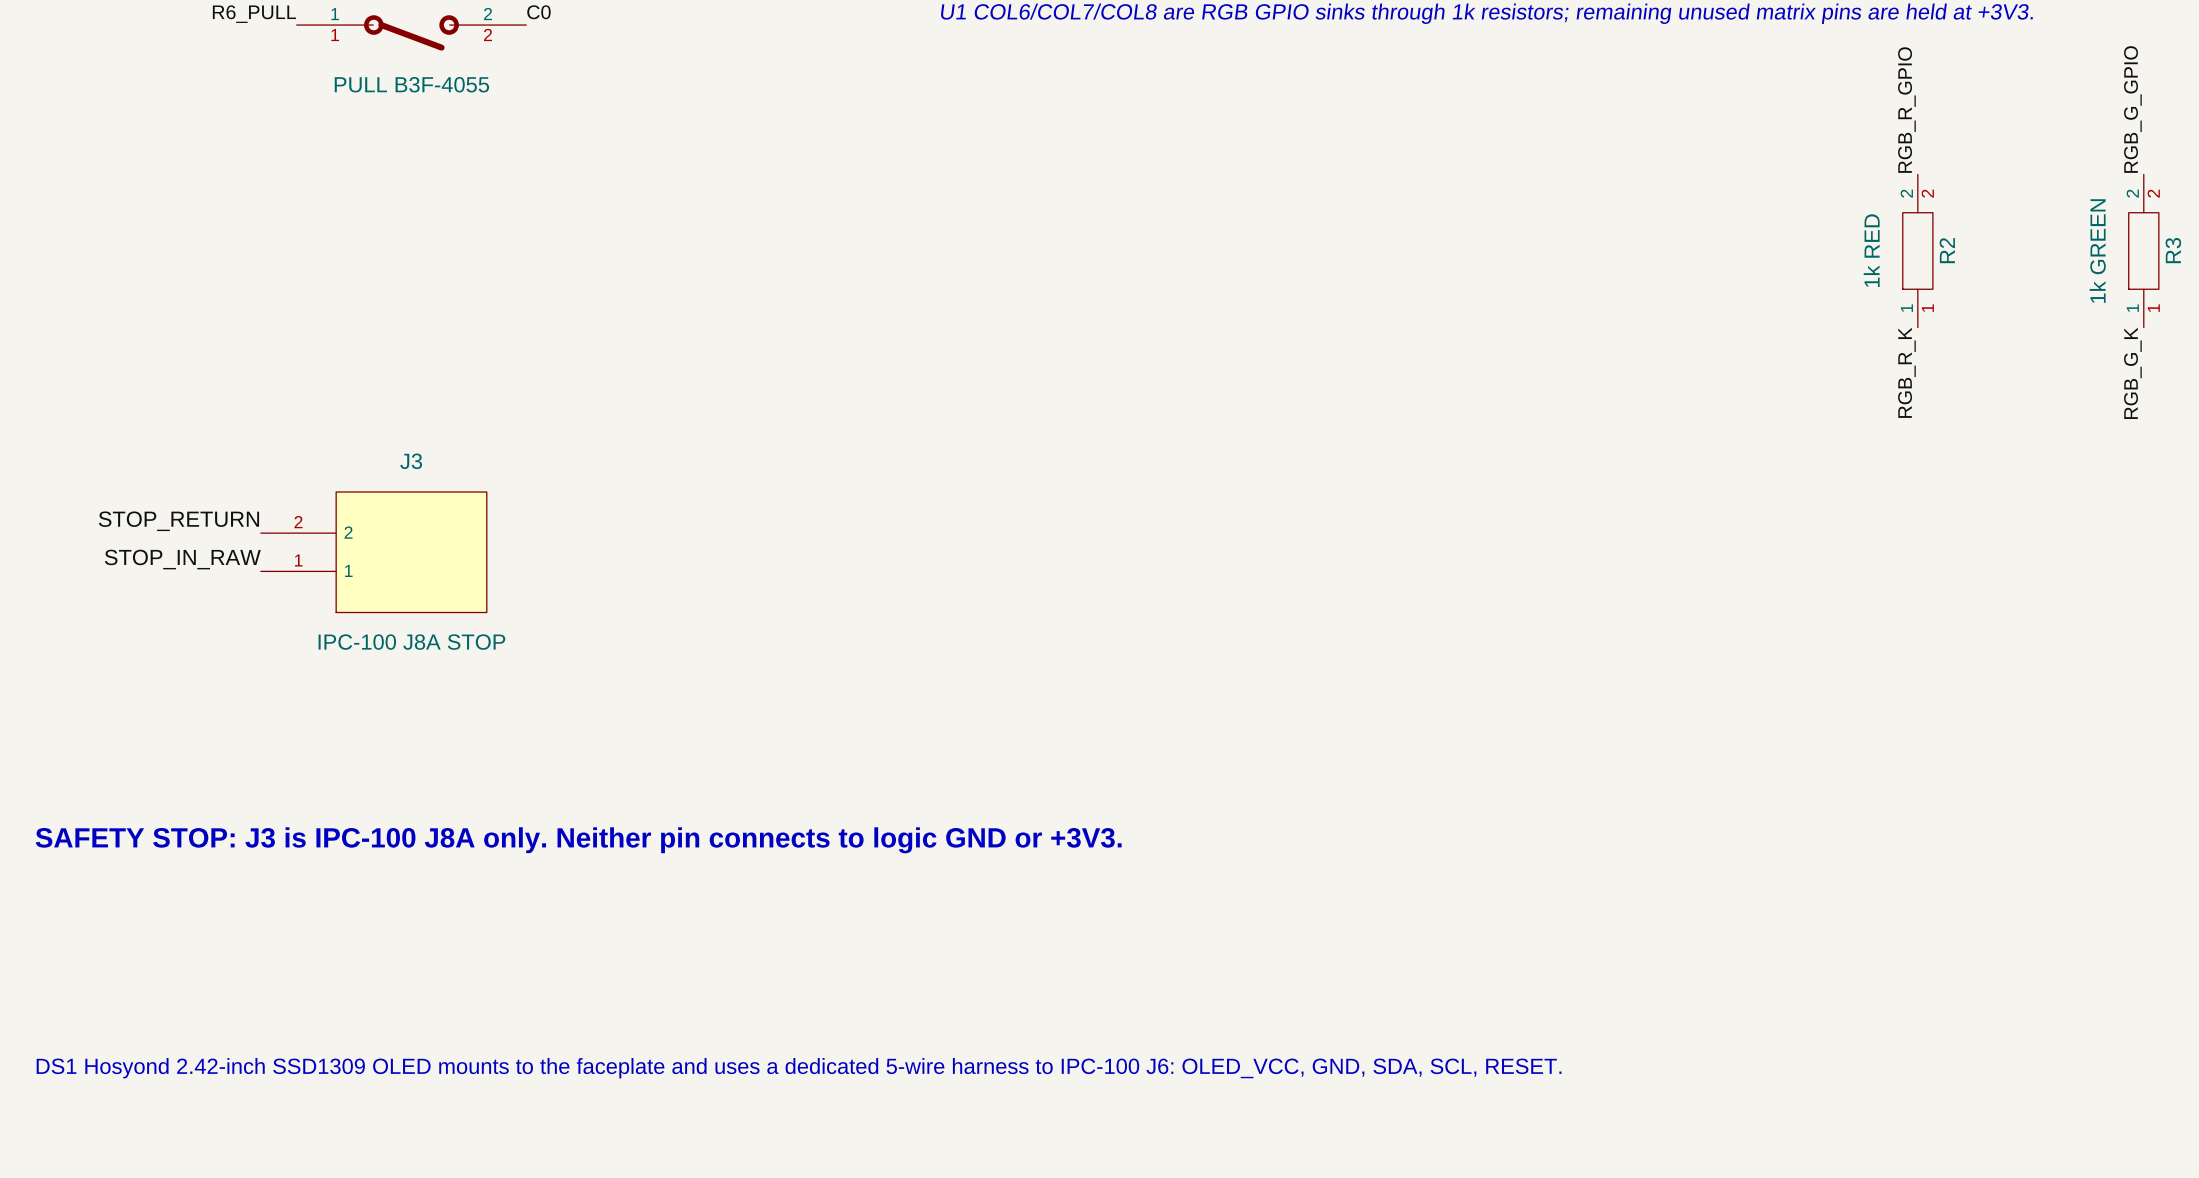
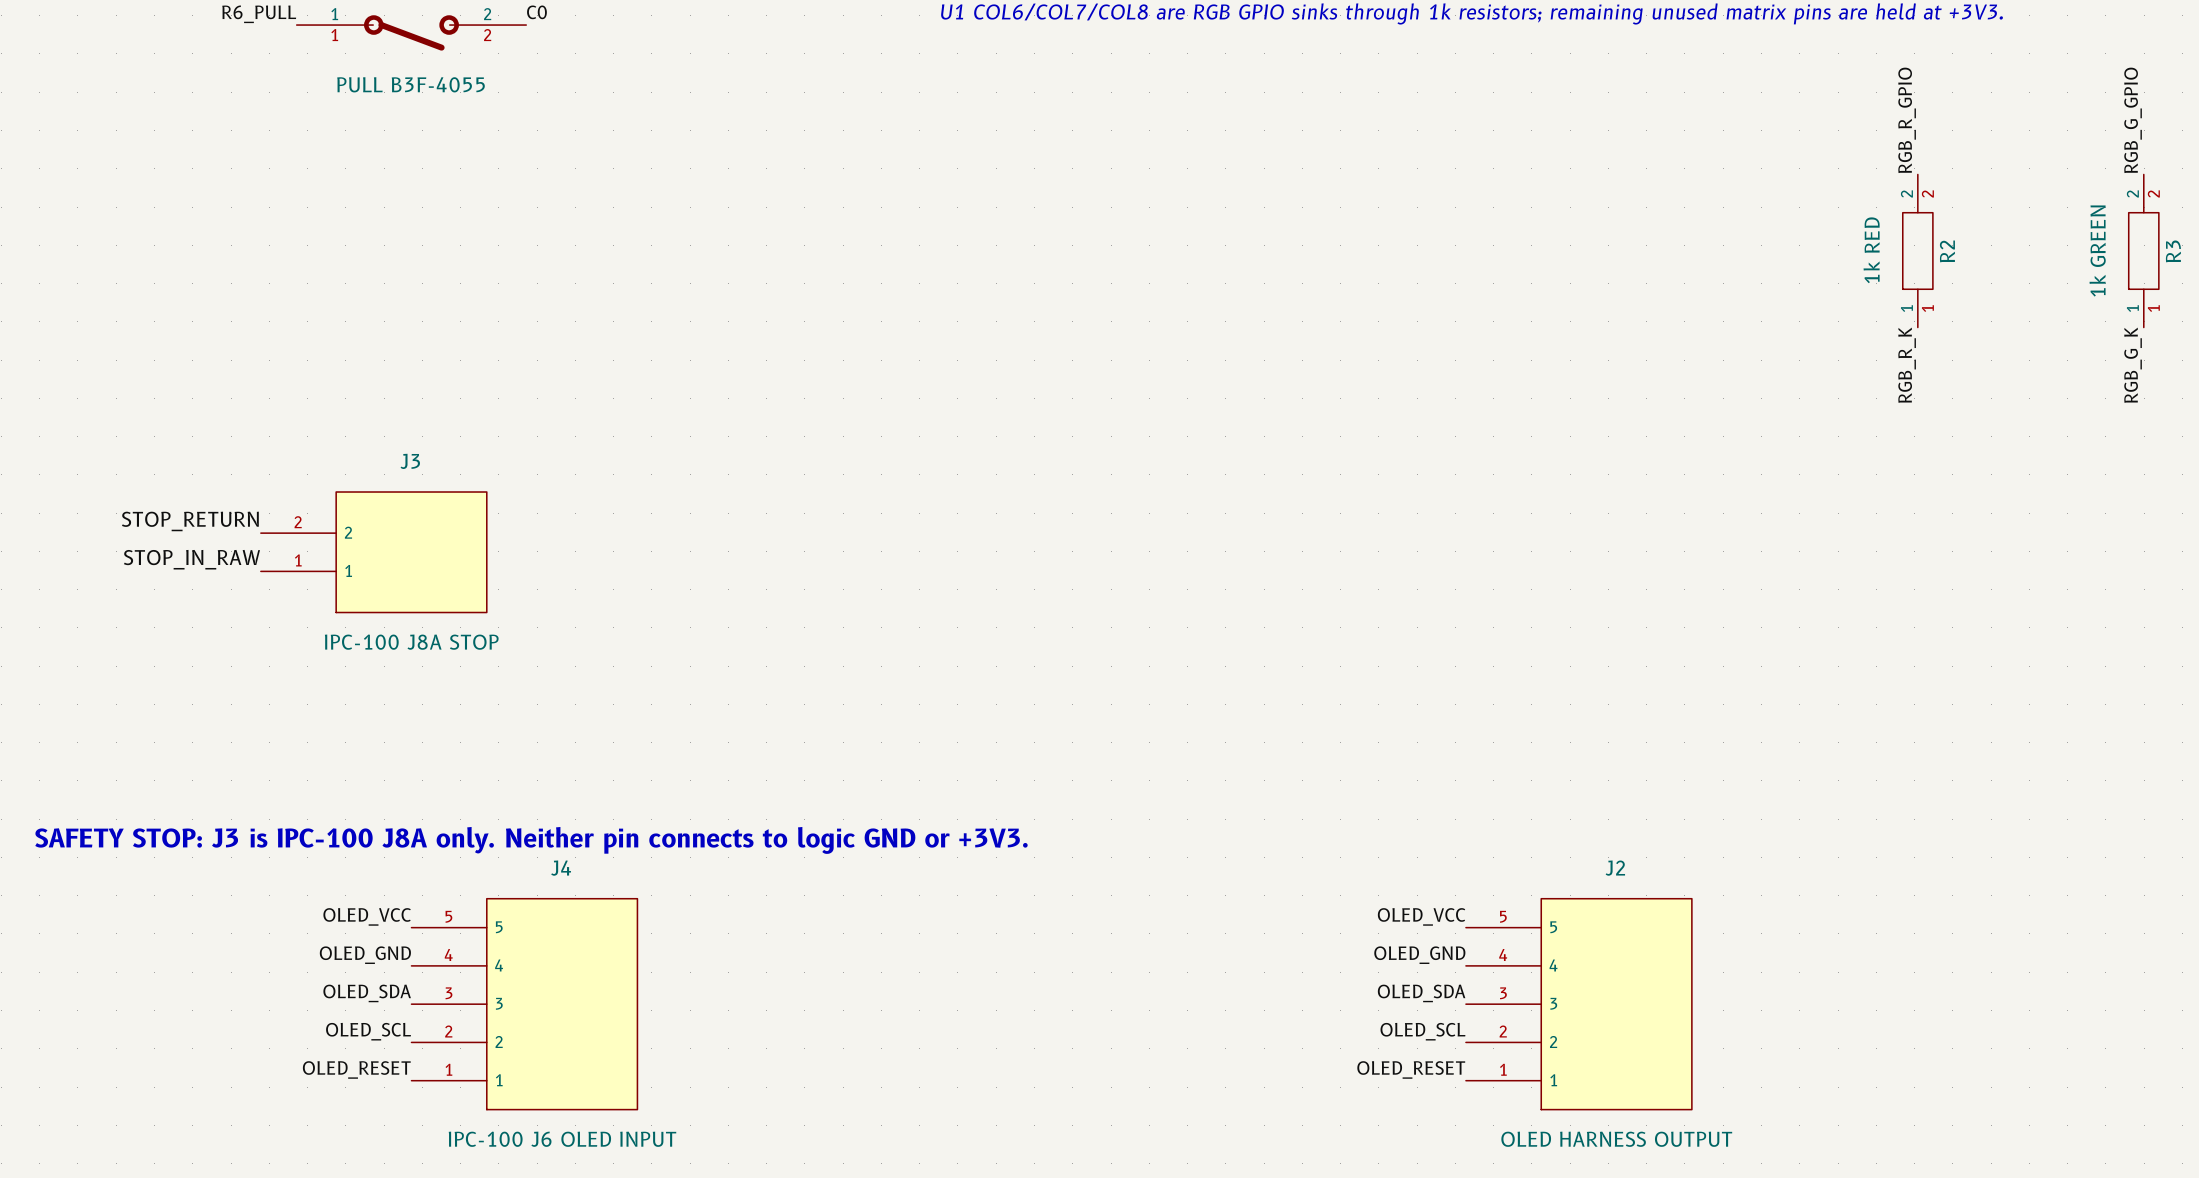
label: none -> OLED_VCC (367, 916)
label: none -> OLED_VCC (1421, 916)
label: none -> OLED_GND (365, 955)
label: none -> OLED_GND (1419, 955)
label: none -> OLED_SDA (367, 993)
label: none -> OLED_SDA (1421, 993)
J4: none -> IPC-100 J6 OLED INPUT (524, 1004)
J2: none -> OLED HARNESS OUTPUT (1578, 1004)
label: none -> OLED_SCL (368, 1031)
label: none -> OLED_SCL (1422, 1031)
text: DS1 Hosyond 2.42-inch SSD1309 OLED mounts to the faceplate and uses a dedicated 5-wire harness to IPC-100 J6: OLED_VCC, GND, SDA, SCL, RESET. (799, 1068) -> none
label: none -> OLED_RESET (356, 1069)
label: none -> OLED_RESET (1411, 1069)

